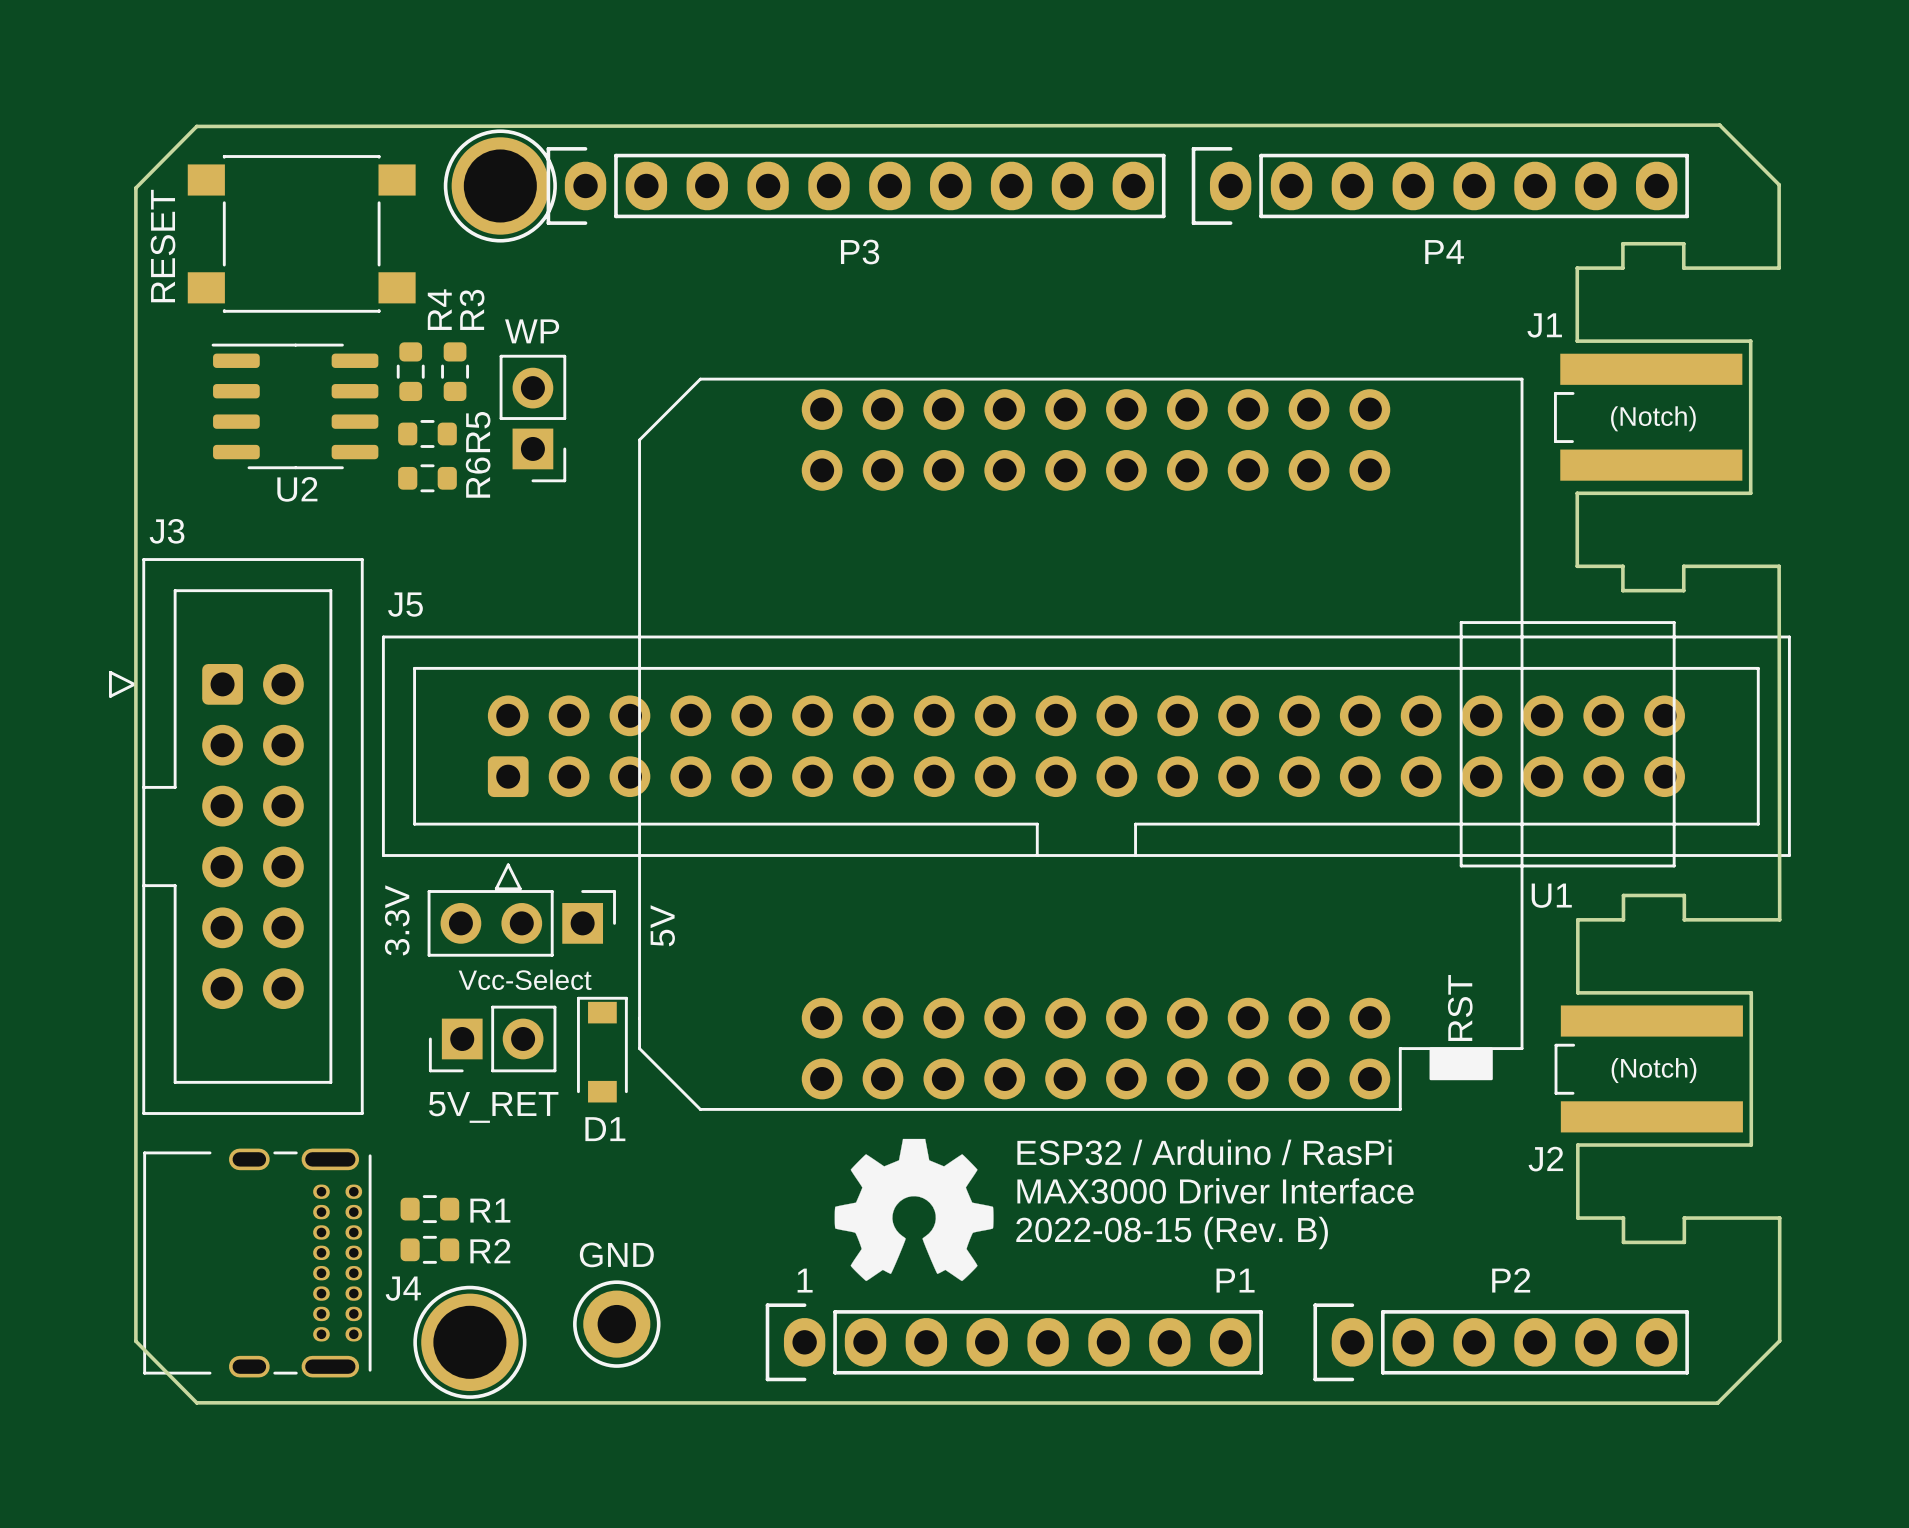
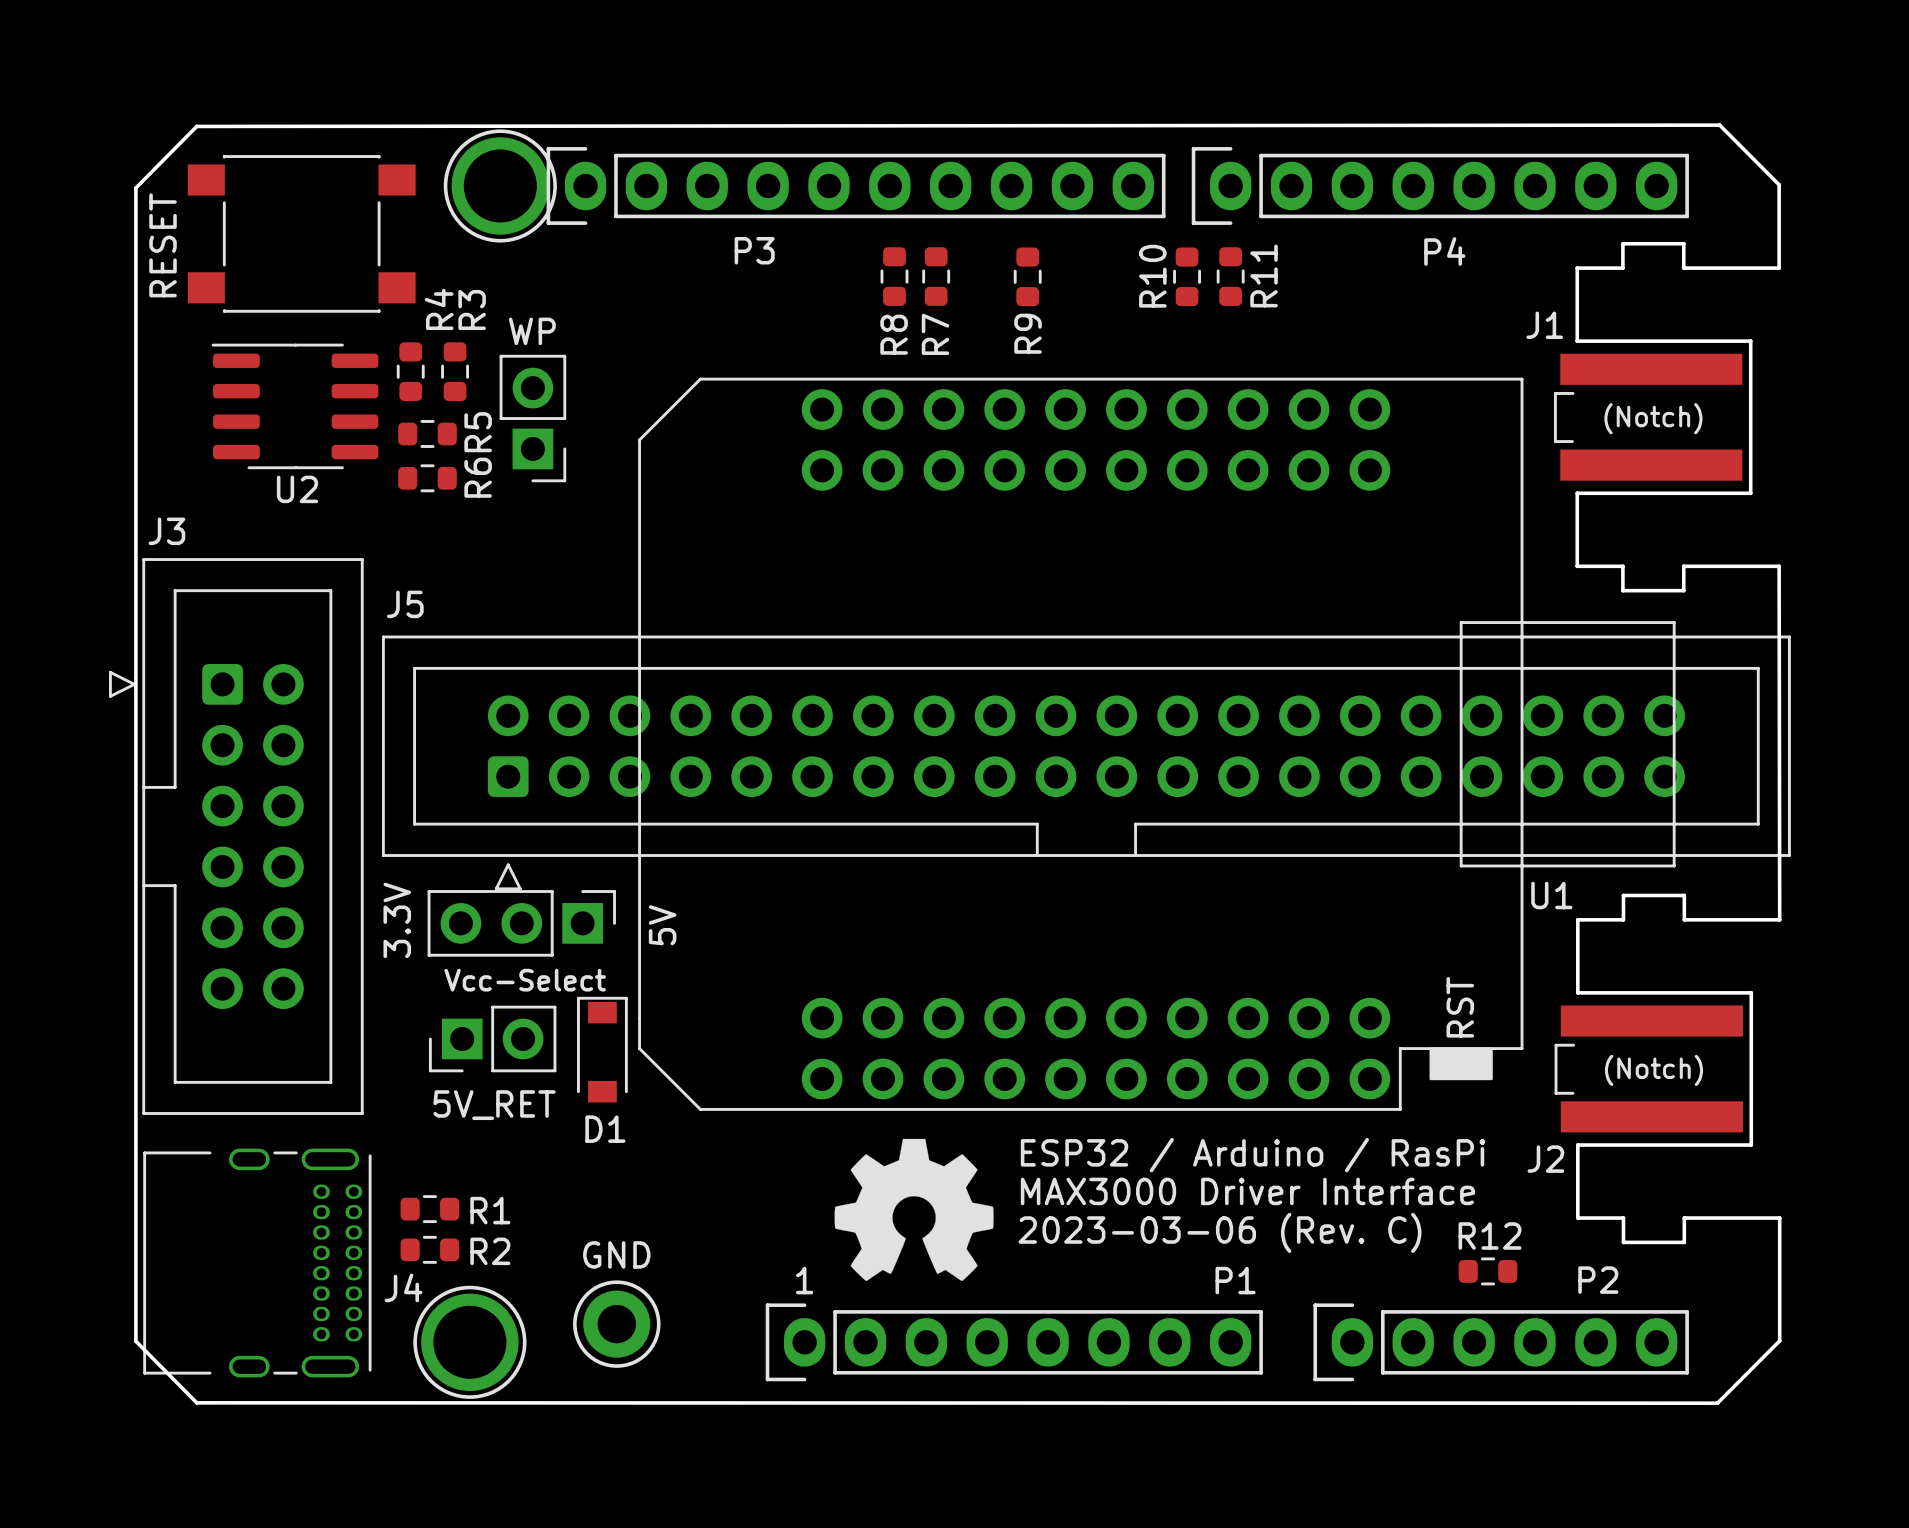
P3 name position: P3 (860, 252) -> P3 (754, 250)
R8: none -> (894, 276)
R7: none -> (936, 276)
R9: none -> (1027, 276)
R10: none -> (1187, 276)
R11: none -> (1230, 276)
text: 2022-08-15 (Rev. B) (1172, 1232) -> 2023-03-06 (Rev. C) (1219, 1232)
R12: none -> (1488, 1271)
P2 name position: P2 (1511, 1280) -> P2 (1598, 1280)

